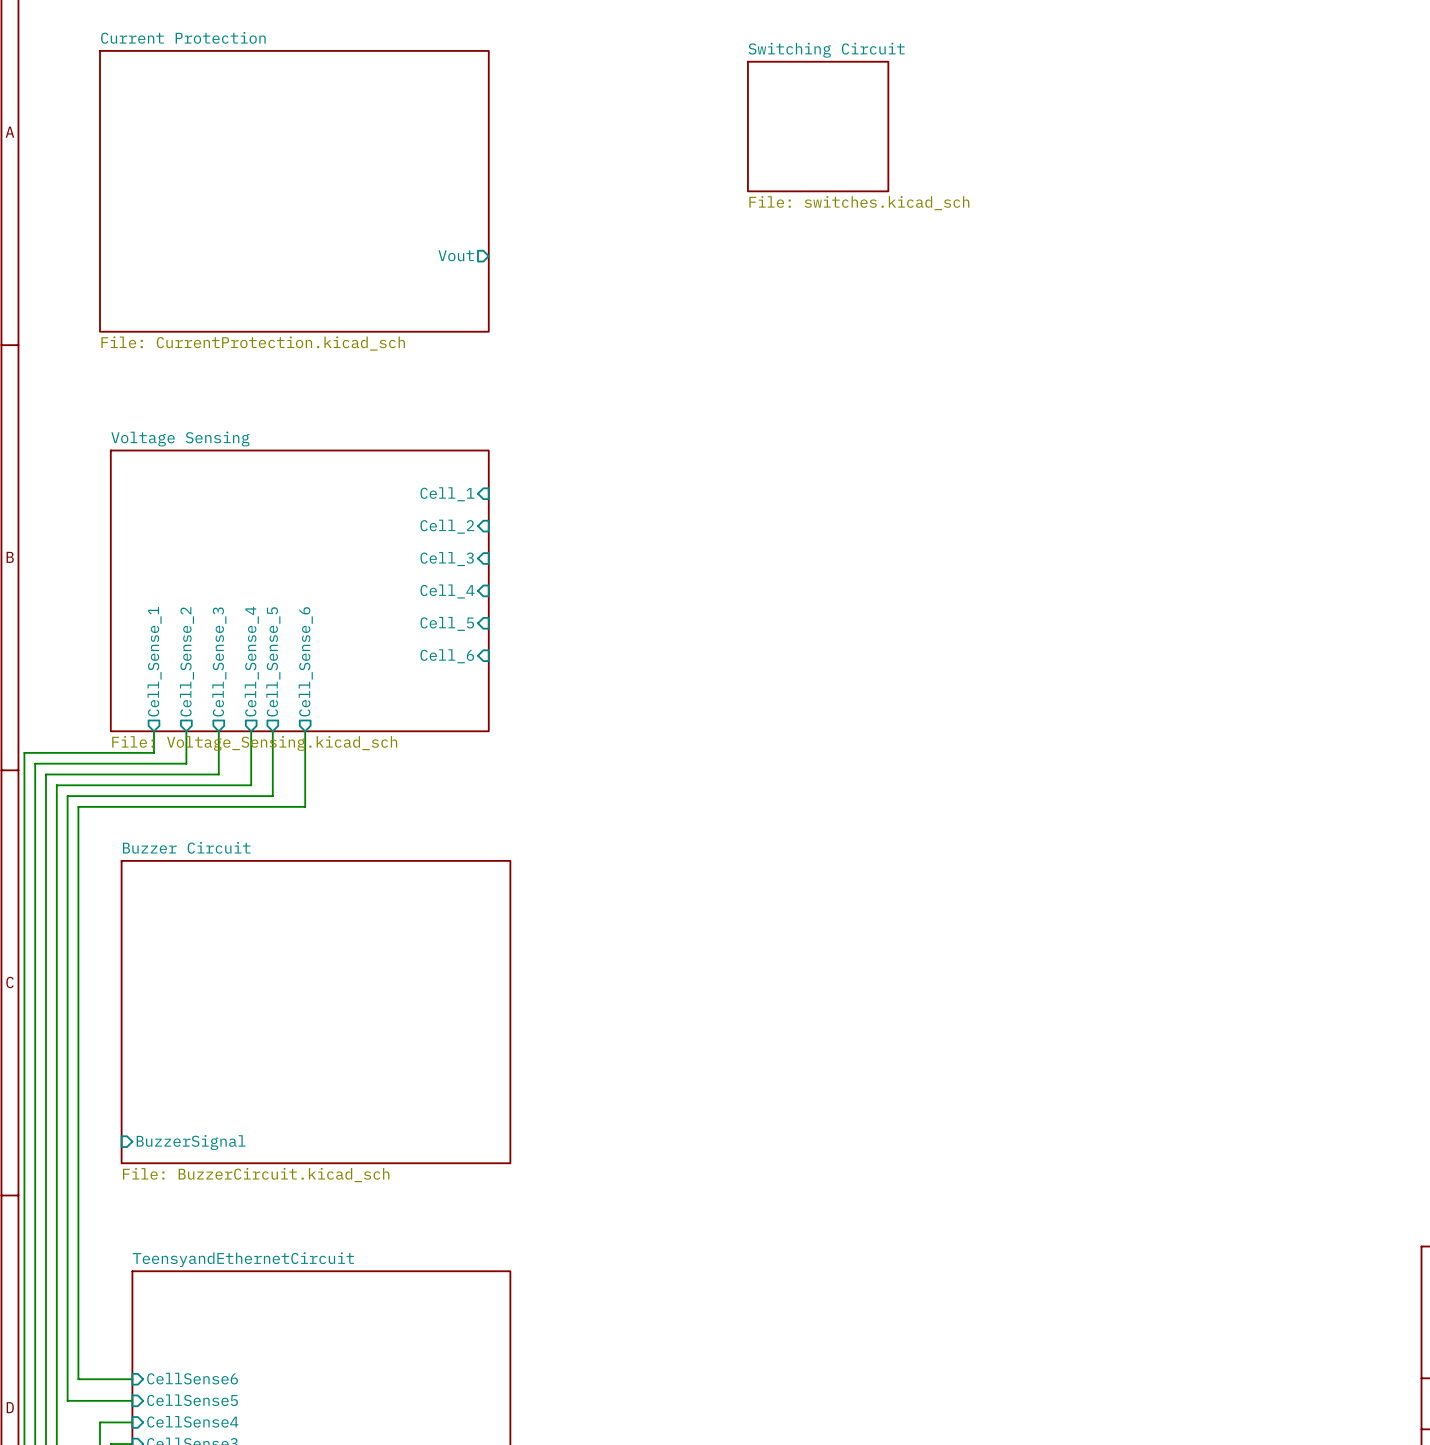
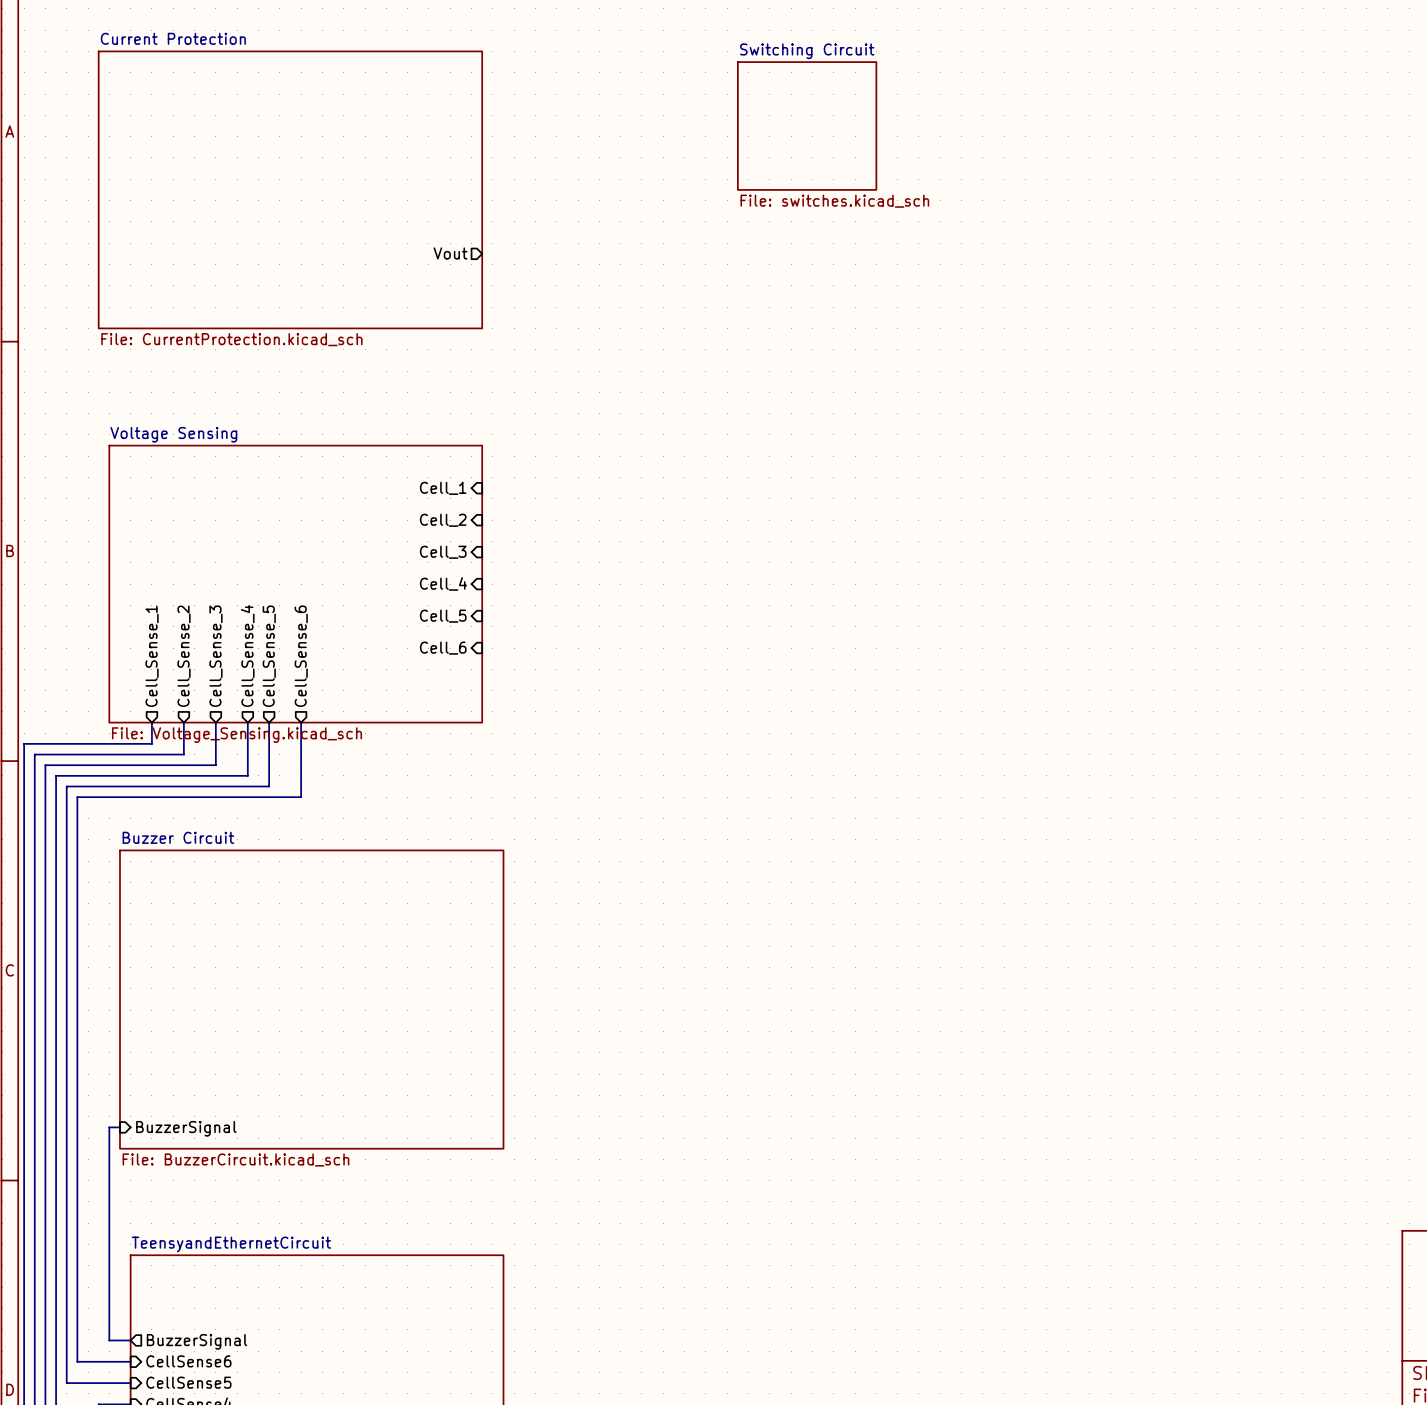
wire: none -> (119, 1127) (109, 1127) (109, 1340) (130, 1340)
sheet pin: none -> BuzzerSignal (197, 1341)

